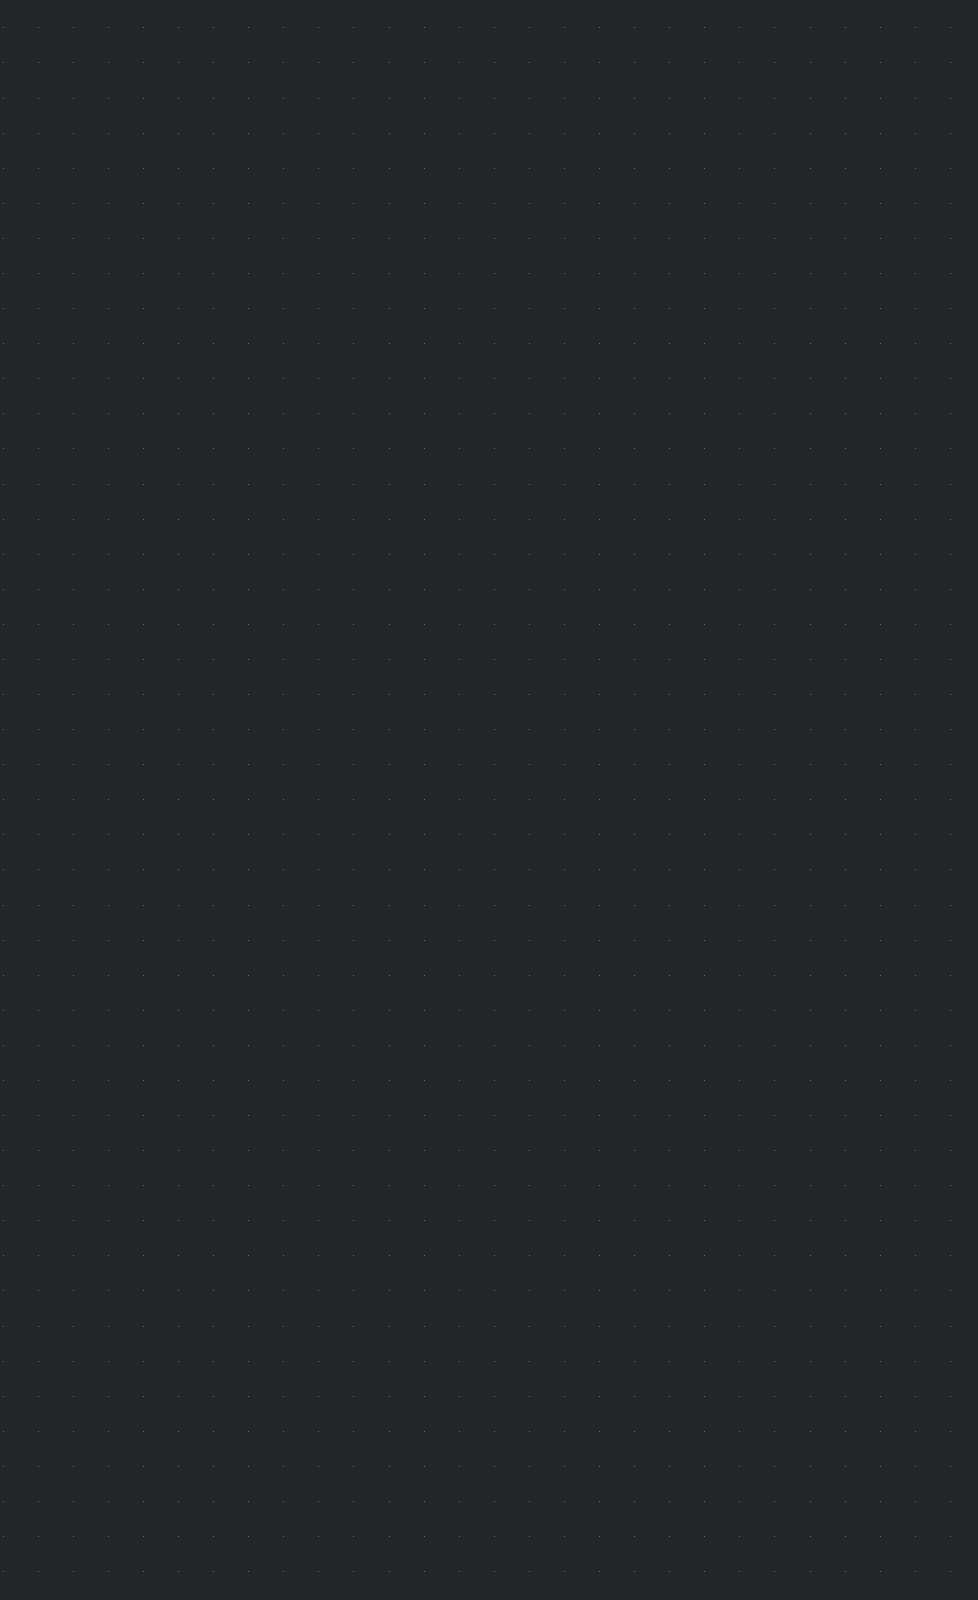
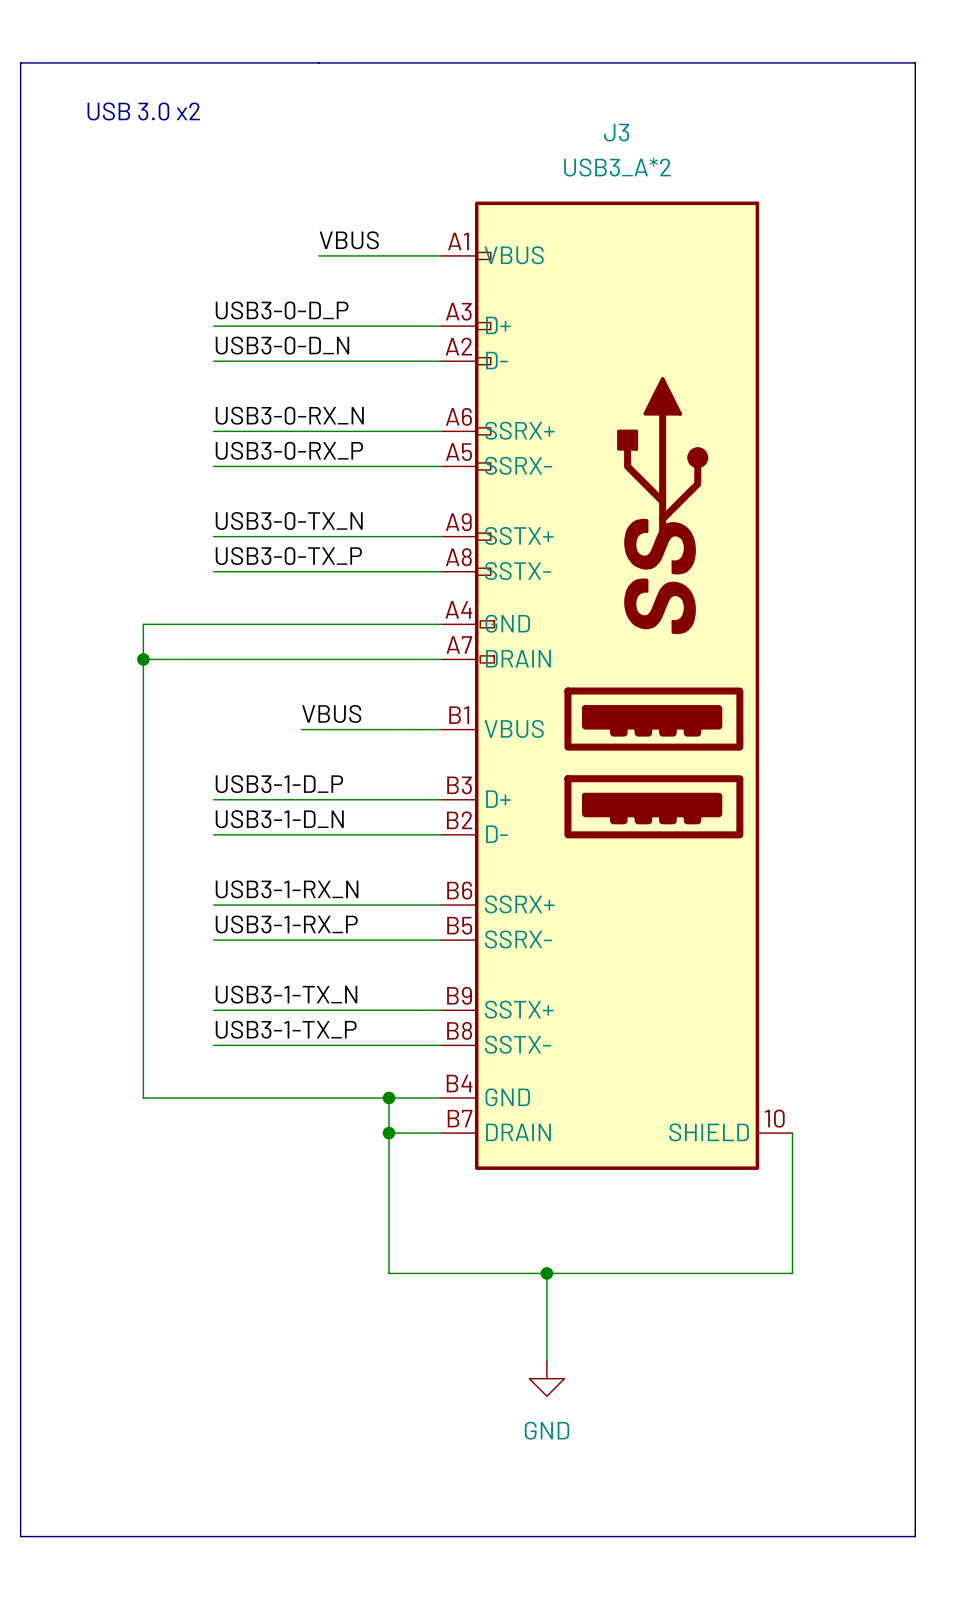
line: none -> (20, 62) (915, 62) (915, 1536) (20, 1536) (20, 62)
text: none -> USB 3.0 x2 (143, 111)
label: none -> VBUS (349, 240)
wire: none -> (318, 255) (441, 255)
label: none -> USB3-0-D_P (282, 310)
wire: none -> (213, 326) (441, 326)
label: none -> USB3-0-D_N (282, 345)
wire: none -> (213, 361) (441, 361)
label: none -> USB3-0-RX_N (289, 415)
wire: none -> (213, 431) (441, 431)
label: none -> USB3-0-RX_P (289, 450)
wire: none -> (213, 466) (441, 466)
label: none -> USB3-0-TX_N (289, 520)
wire: none -> (213, 536) (441, 536)
label: none -> USB3-0-TX_P (288, 556)
wire: none -> (213, 571) (441, 571)
wire: none -> (441, 624) (143, 624) (143, 1098) (441, 1098)
wire: none -> (143, 659) (441, 659)
junction: none -> (143, 659)
J3: none -> USB3_A*2 (617, 685)
label: none -> VBUS (331, 713)
wire: none -> (301, 729) (441, 729)
label: none -> USB3-1-D_P (279, 784)
wire: none -> (213, 799) (441, 799)
label: none -> USB3-1-D_N (279, 819)
wire: none -> (213, 834) (441, 834)
label: none -> USB3-1-RX_N (287, 889)
wire: none -> (213, 905) (441, 905)
label: none -> USB3-1-RX_P (286, 924)
wire: none -> (213, 940) (441, 940)
label: none -> USB3-1-TX_N (286, 994)
wire: none -> (213, 1010) (441, 1010)
label: none -> USB3-1-TX_P (286, 1029)
wire: none -> (213, 1045) (441, 1045)
wire: none -> (389, 1098) (389, 1273) (792, 1273) (792, 1133)
junction: none -> (389, 1098)
wire: none -> (389, 1133) (441, 1133)
junction: none -> (389, 1133)
wire: none -> (546, 1273) (546, 1361)
junction: none -> (546, 1273)
power symbol: none -> GND (546, 1378)

